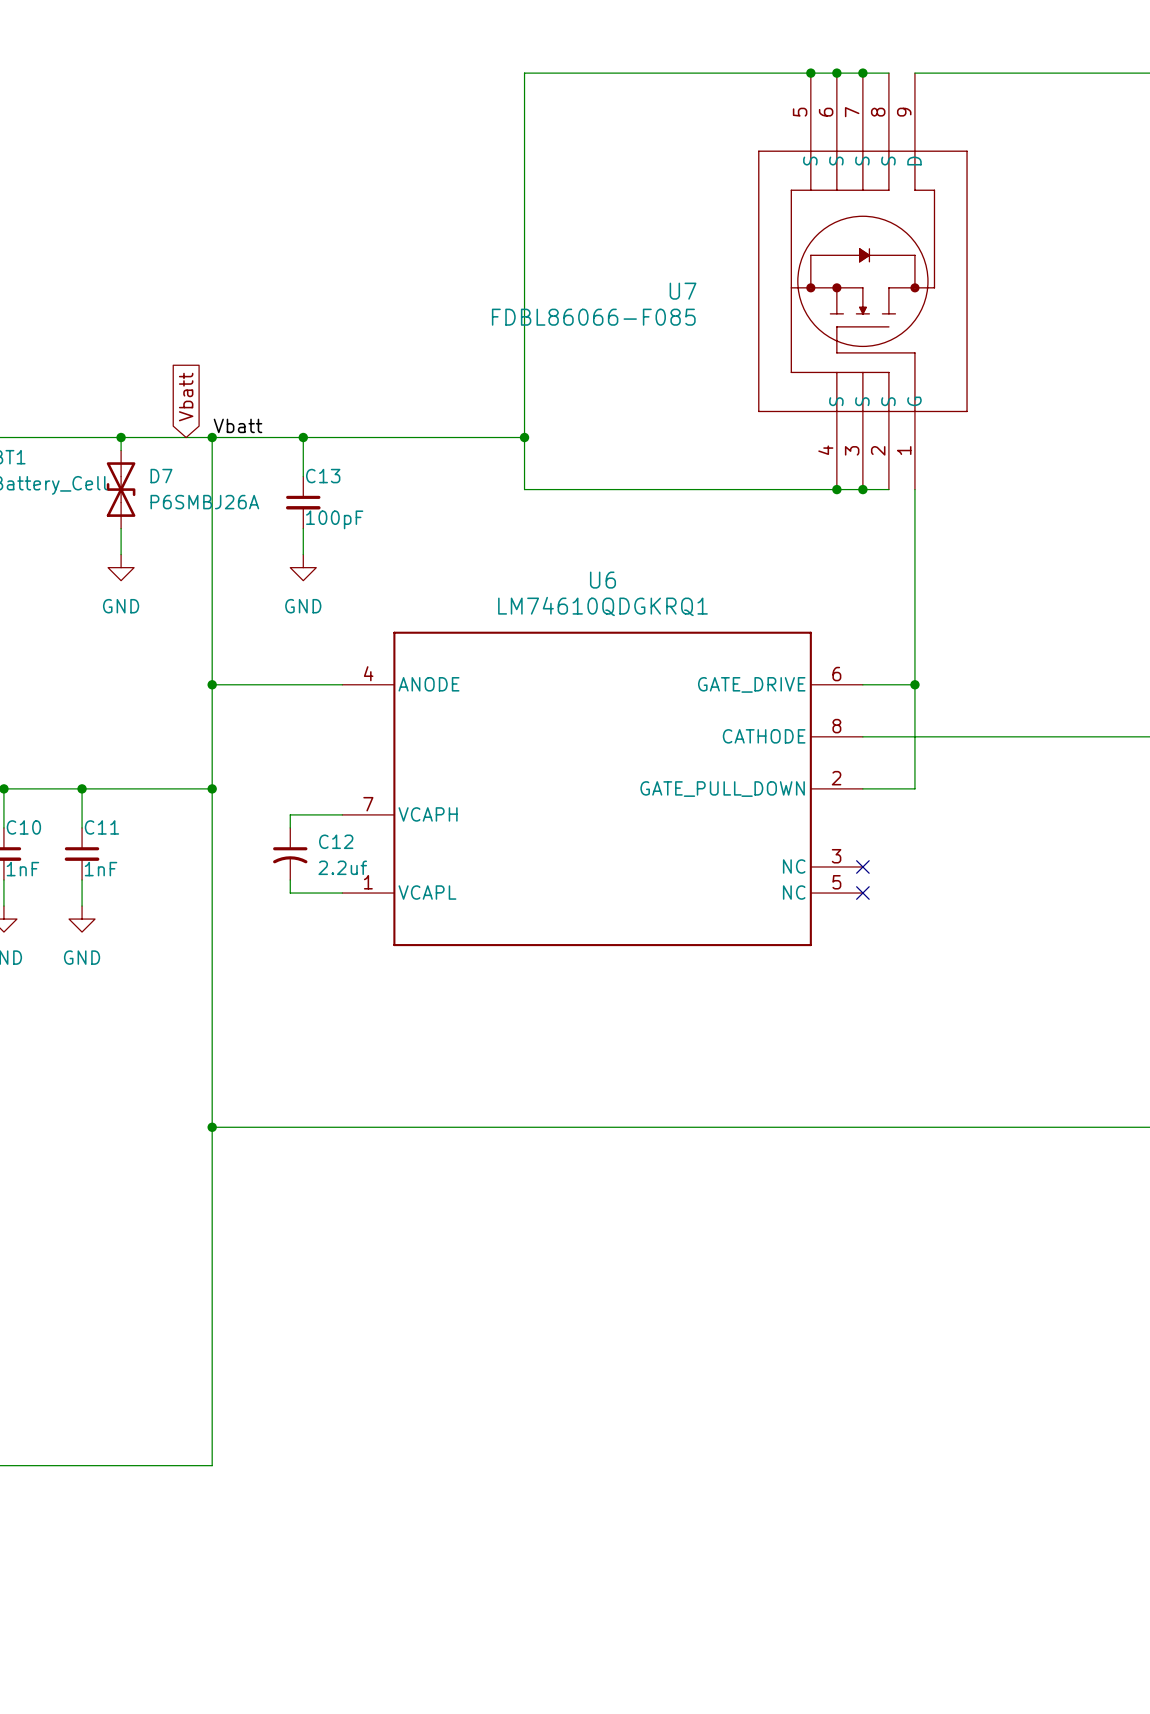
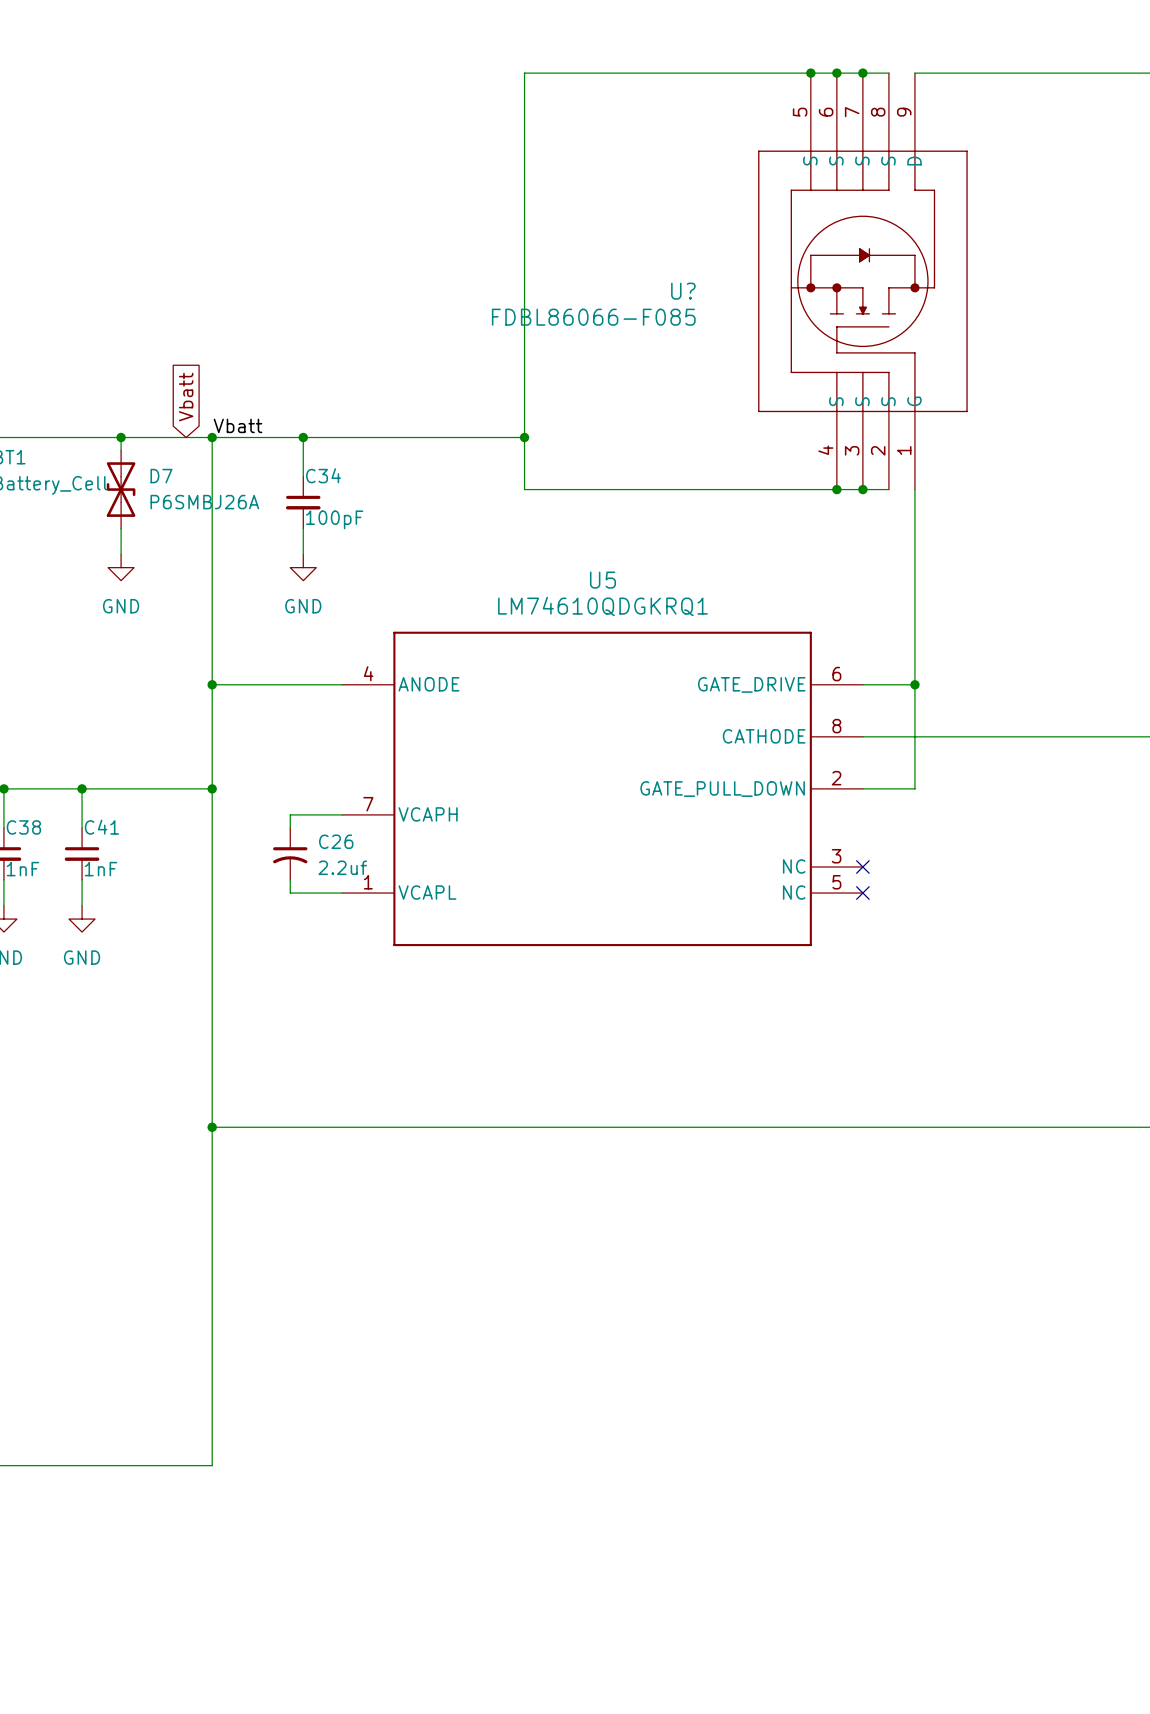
U7 name: U7 (683, 291) -> U? (683, 291)
C13 name: C13 (323, 476) -> C34 (323, 475)
U6 name: U6 (602, 580) -> U5 (602, 580)
C10 name: C10 (23, 827) -> C38 (23, 827)
C11 name: C11 (101, 827) -> C41 (101, 827)
C12 name: C12 (336, 841) -> C26 (336, 841)

